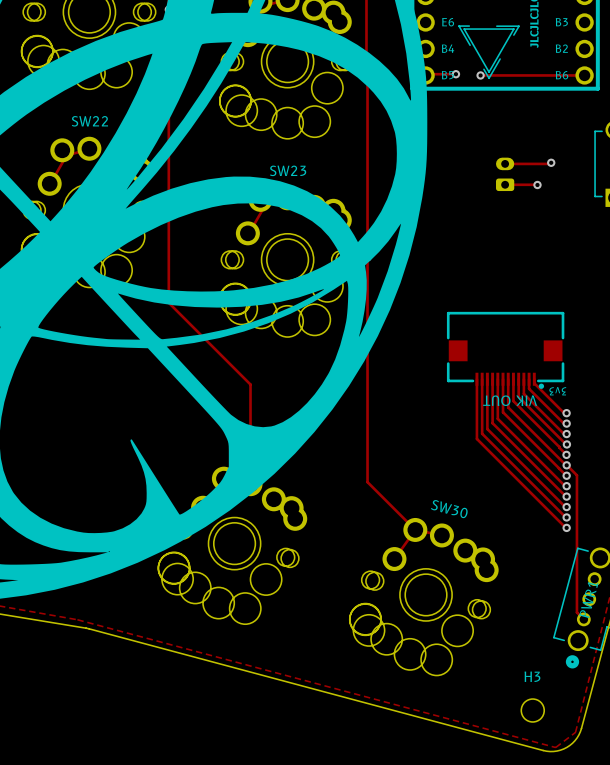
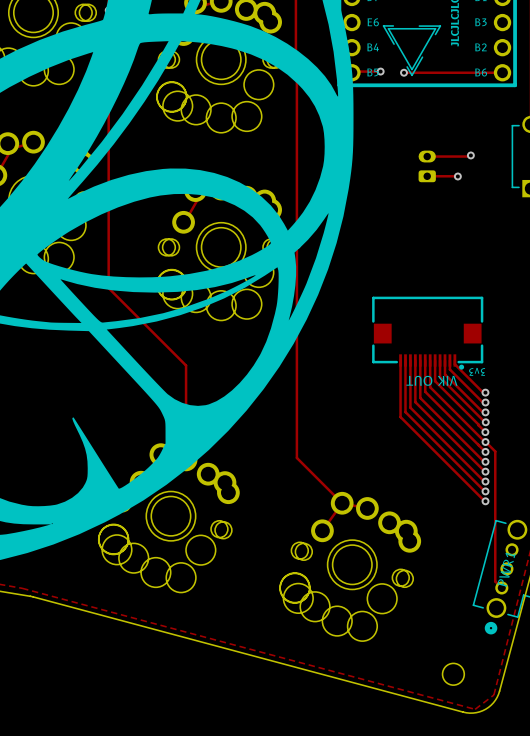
SW22 name: SW22 (89, 121) -> none
SW23 name: SW23 (288, 170) -> none
SW30 name: SW30 (449, 509) -> none
H3 name: H3 (532, 676) -> none

